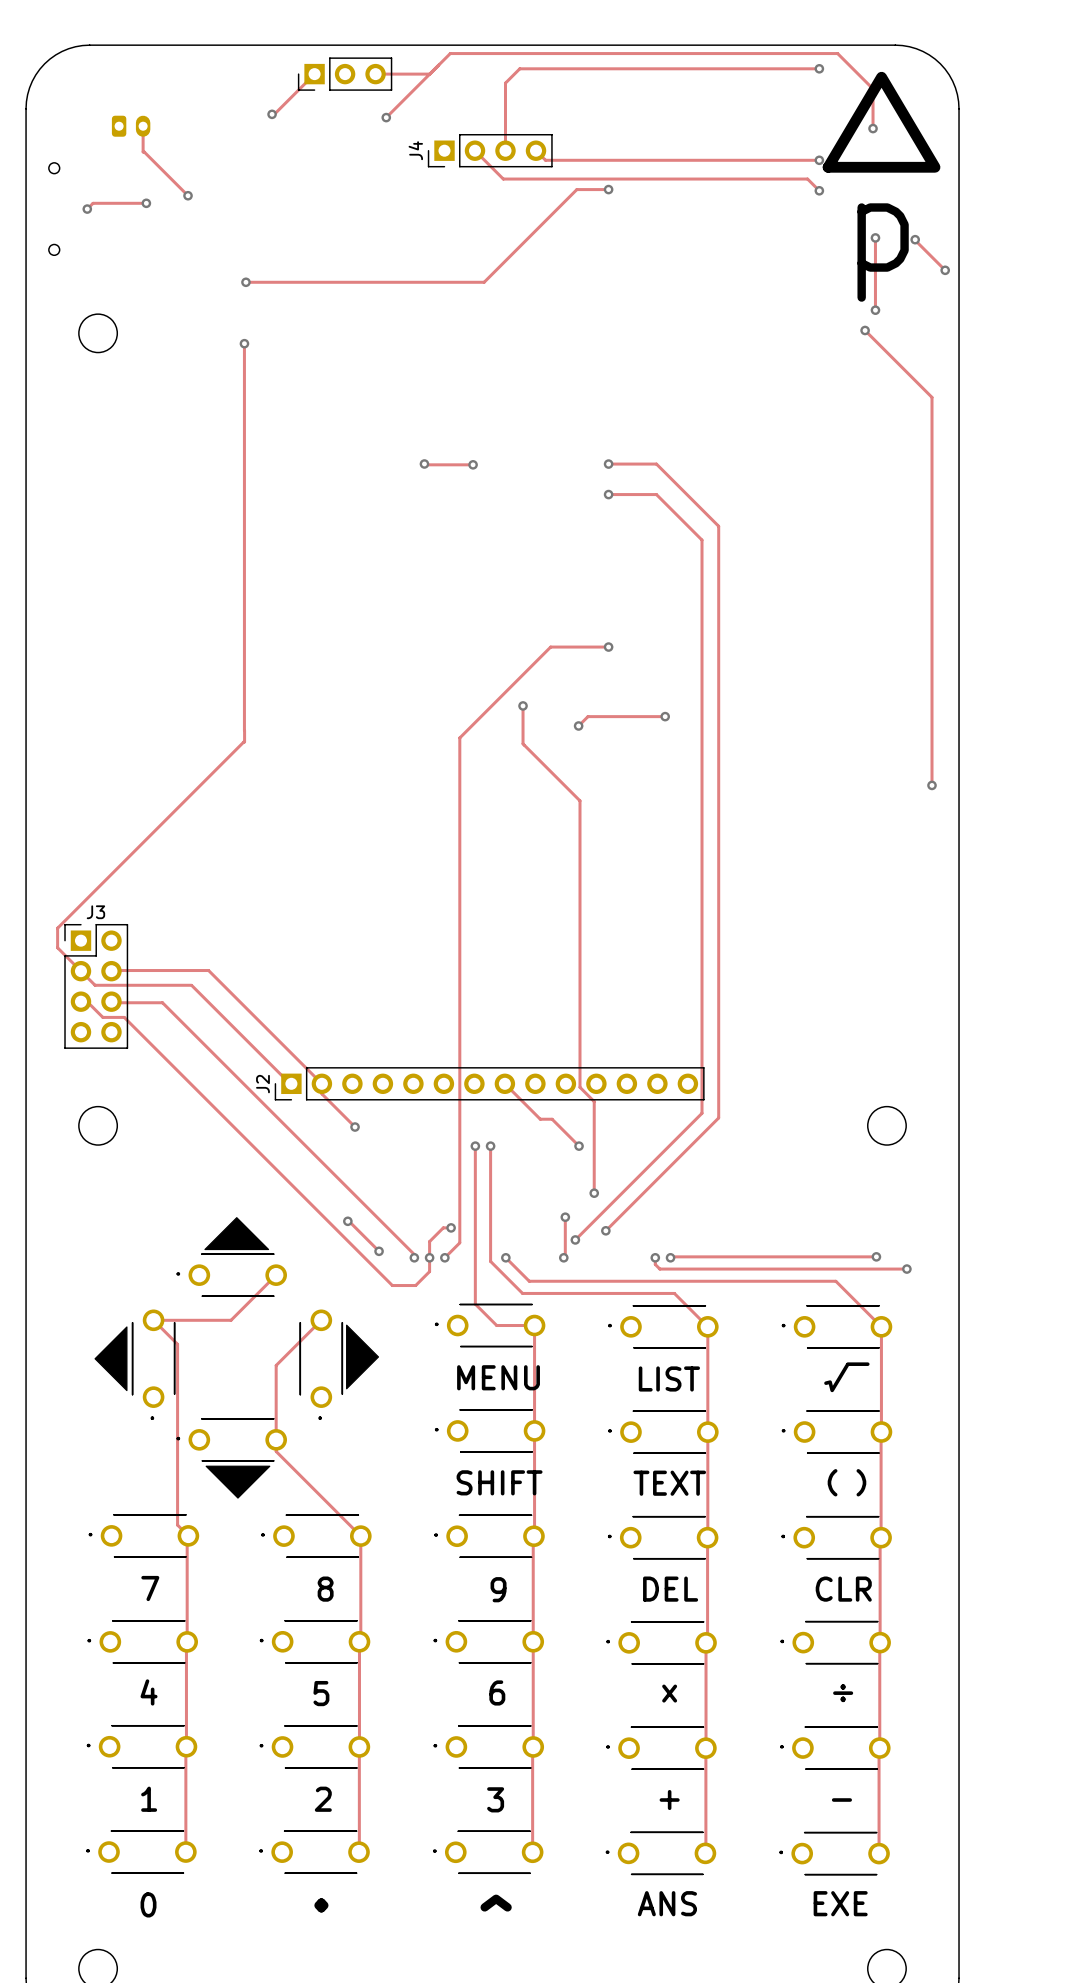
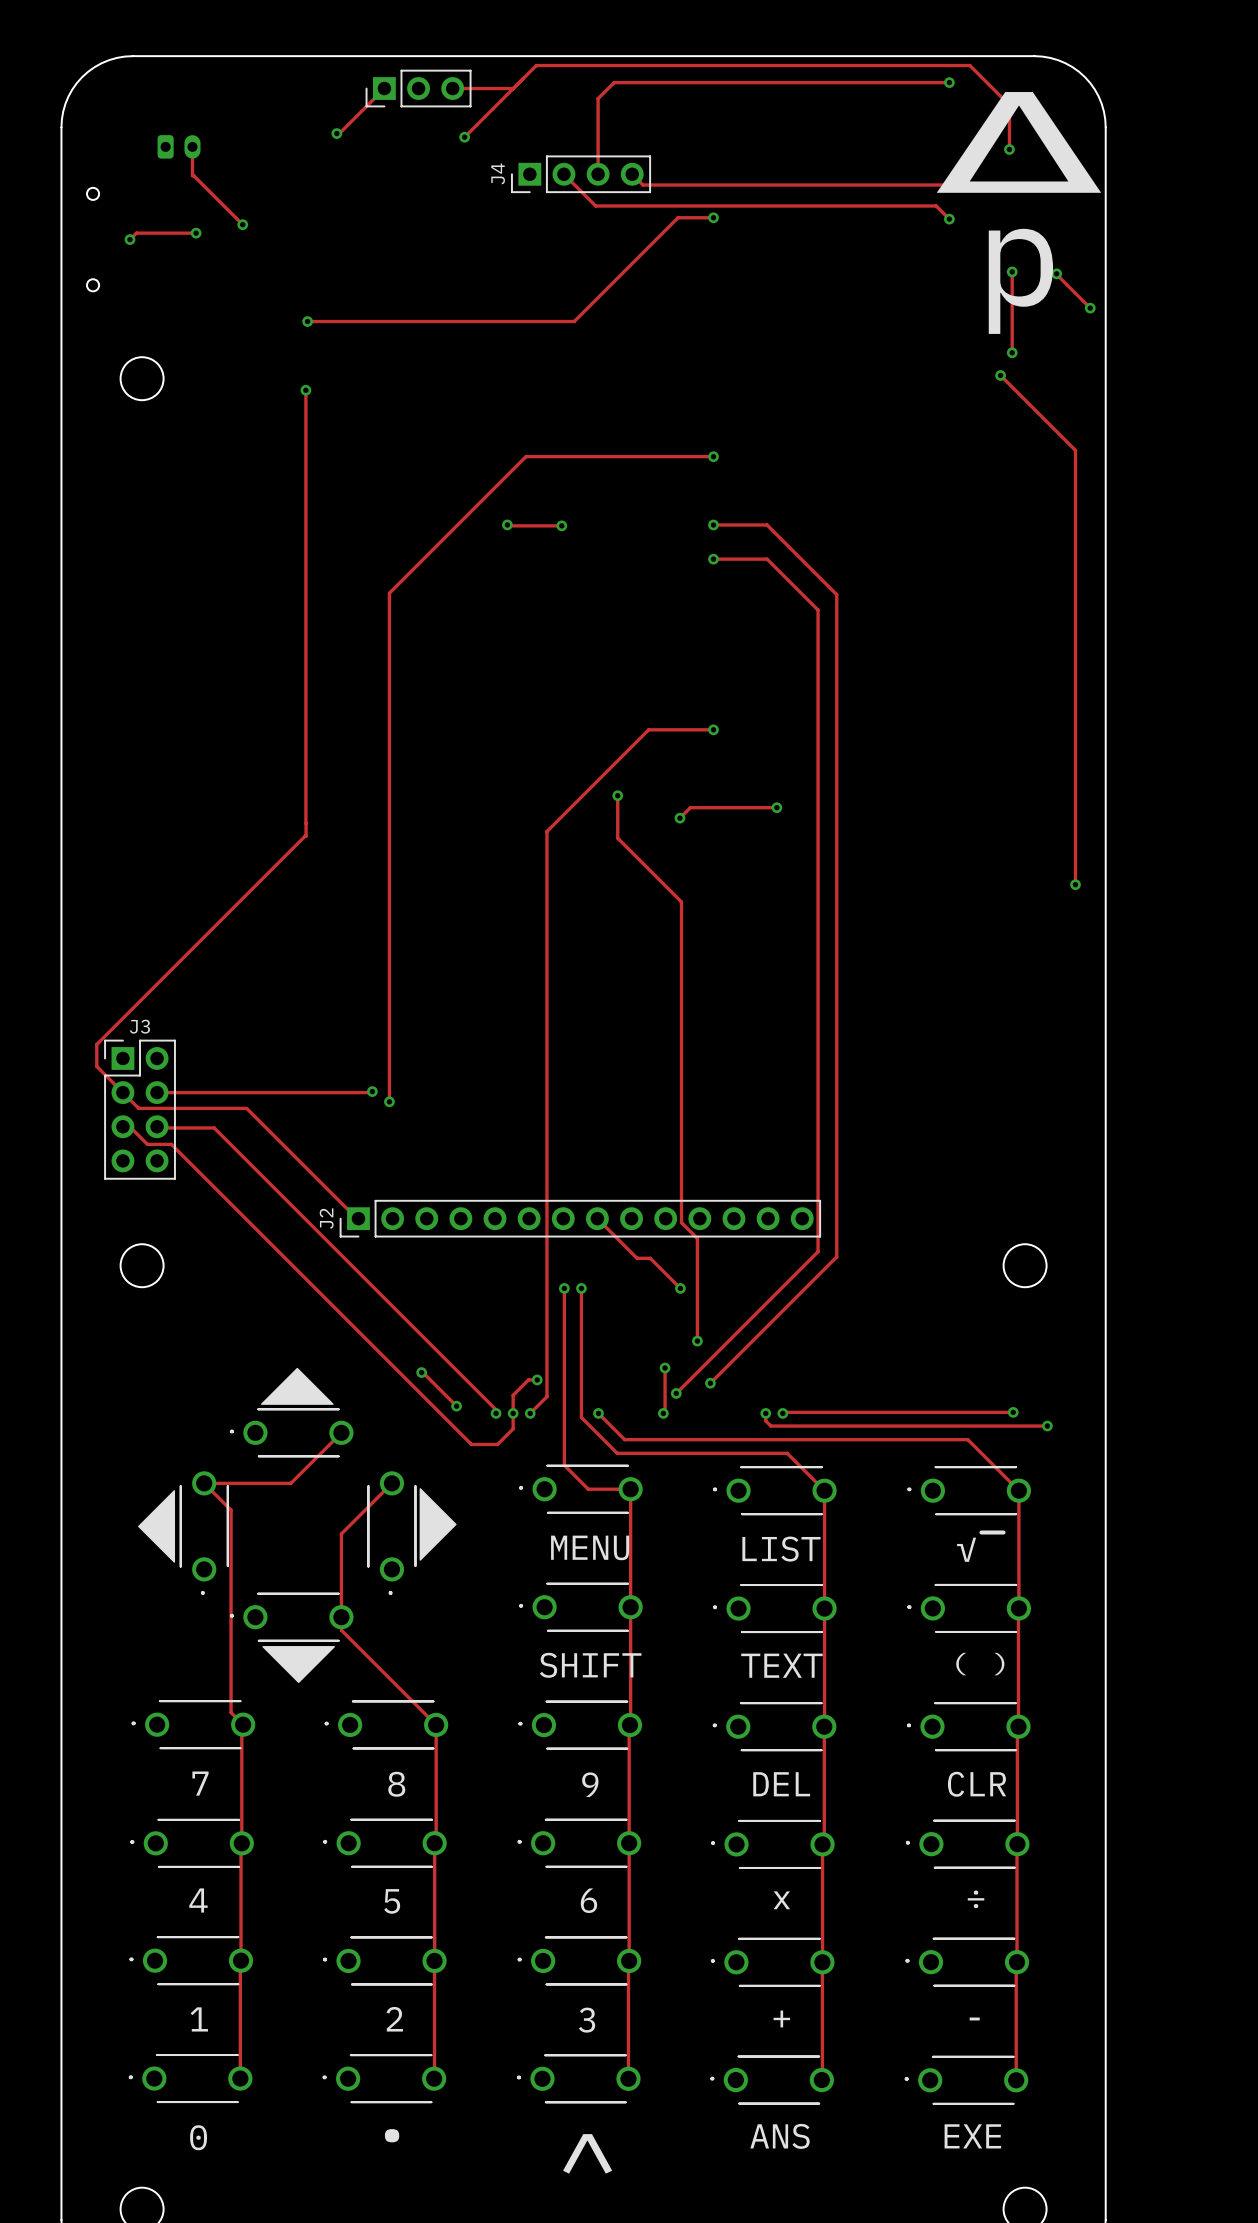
track: none -> (713, 456) (525, 456) (389, 593) (389, 1101)
via: none -> (713, 456)
track: (117, 970) (208, 970) (321, 1083) (321, 1093) (355, 1127) -> none
track: none -> (372, 1091) (157, 1092)
via: none -> (372, 1091)
via: none -> (389, 1101)
via: (355, 1127) -> none

